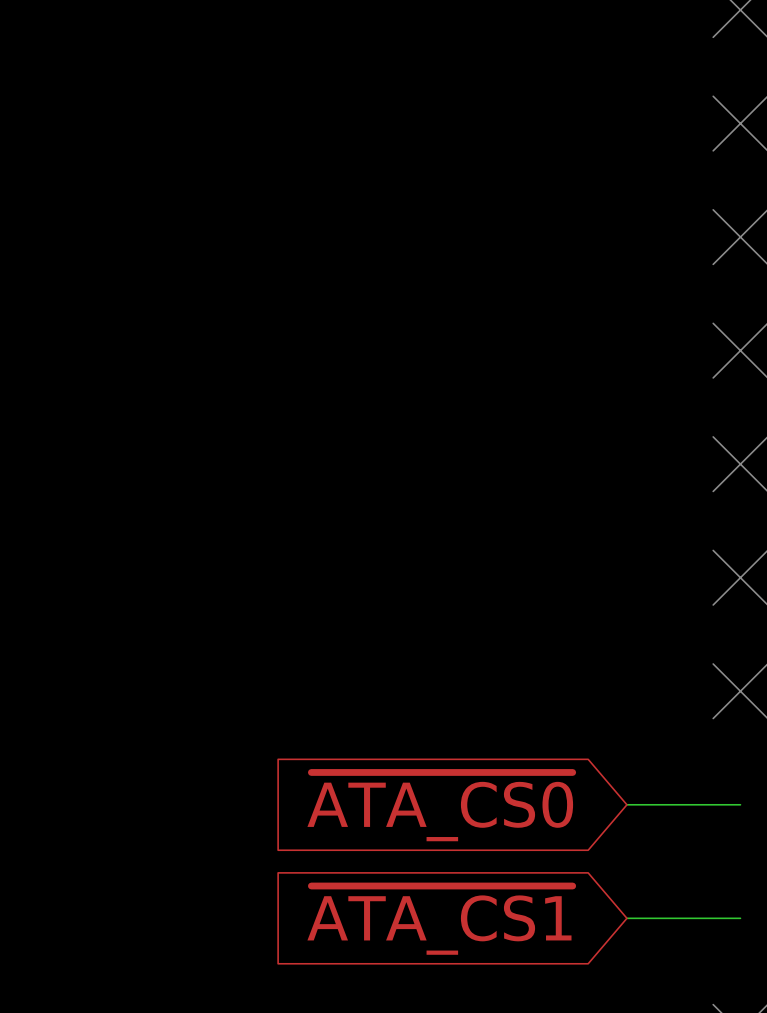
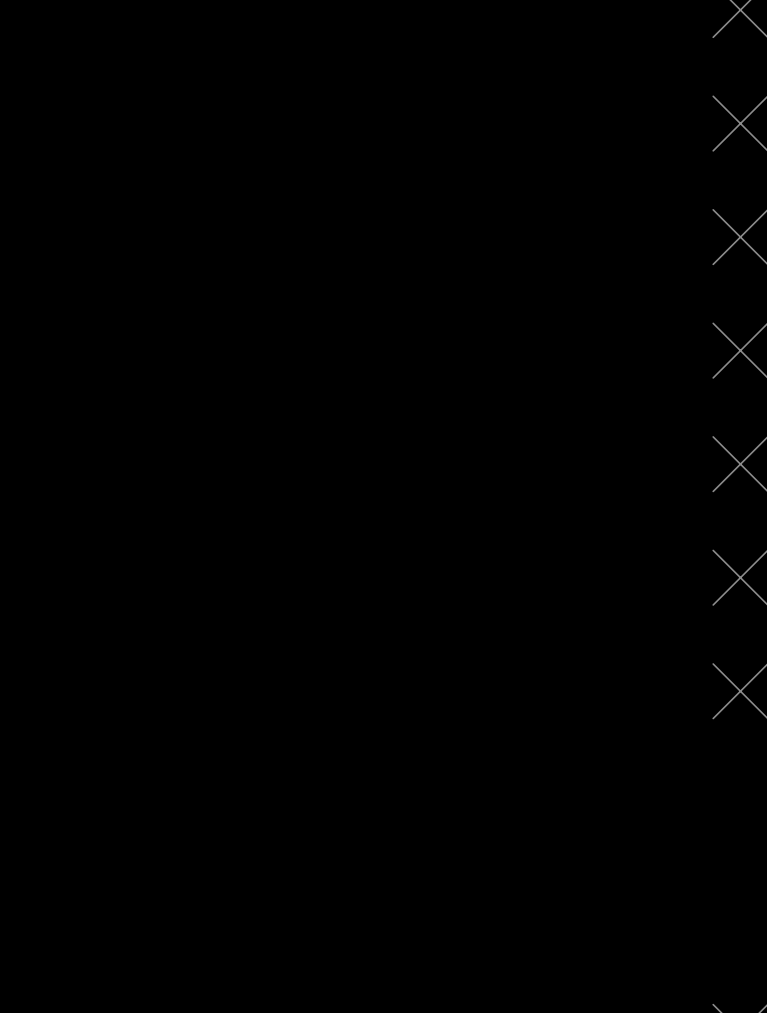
wire: (626, 804) (740, 804) -> none
global label: ~{ATA_CS0} (440, 806) -> none
wire: (626, 918) (740, 918) -> none
global label: ~{ATA_CS1} (440, 920) -> none

